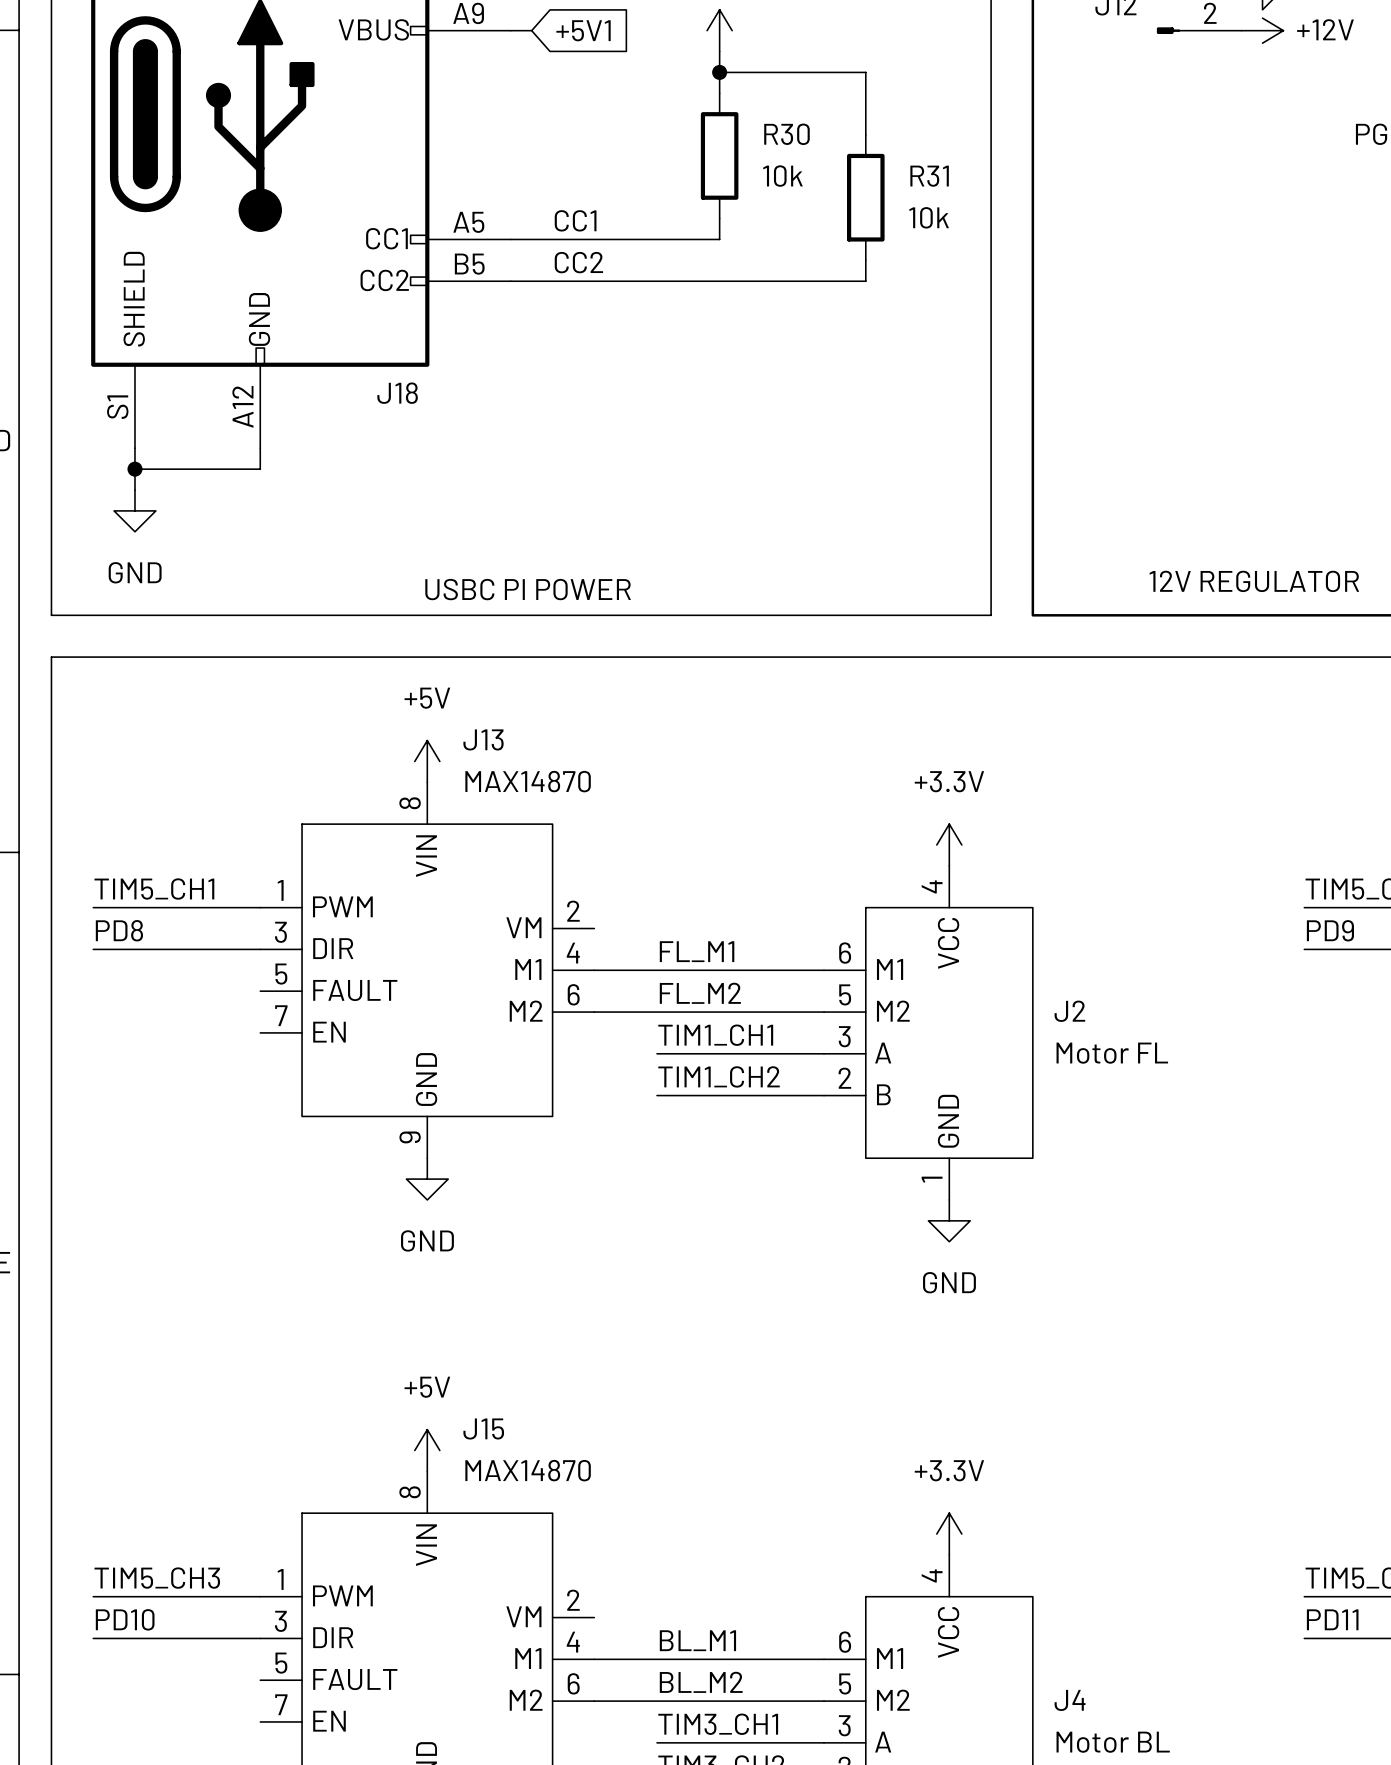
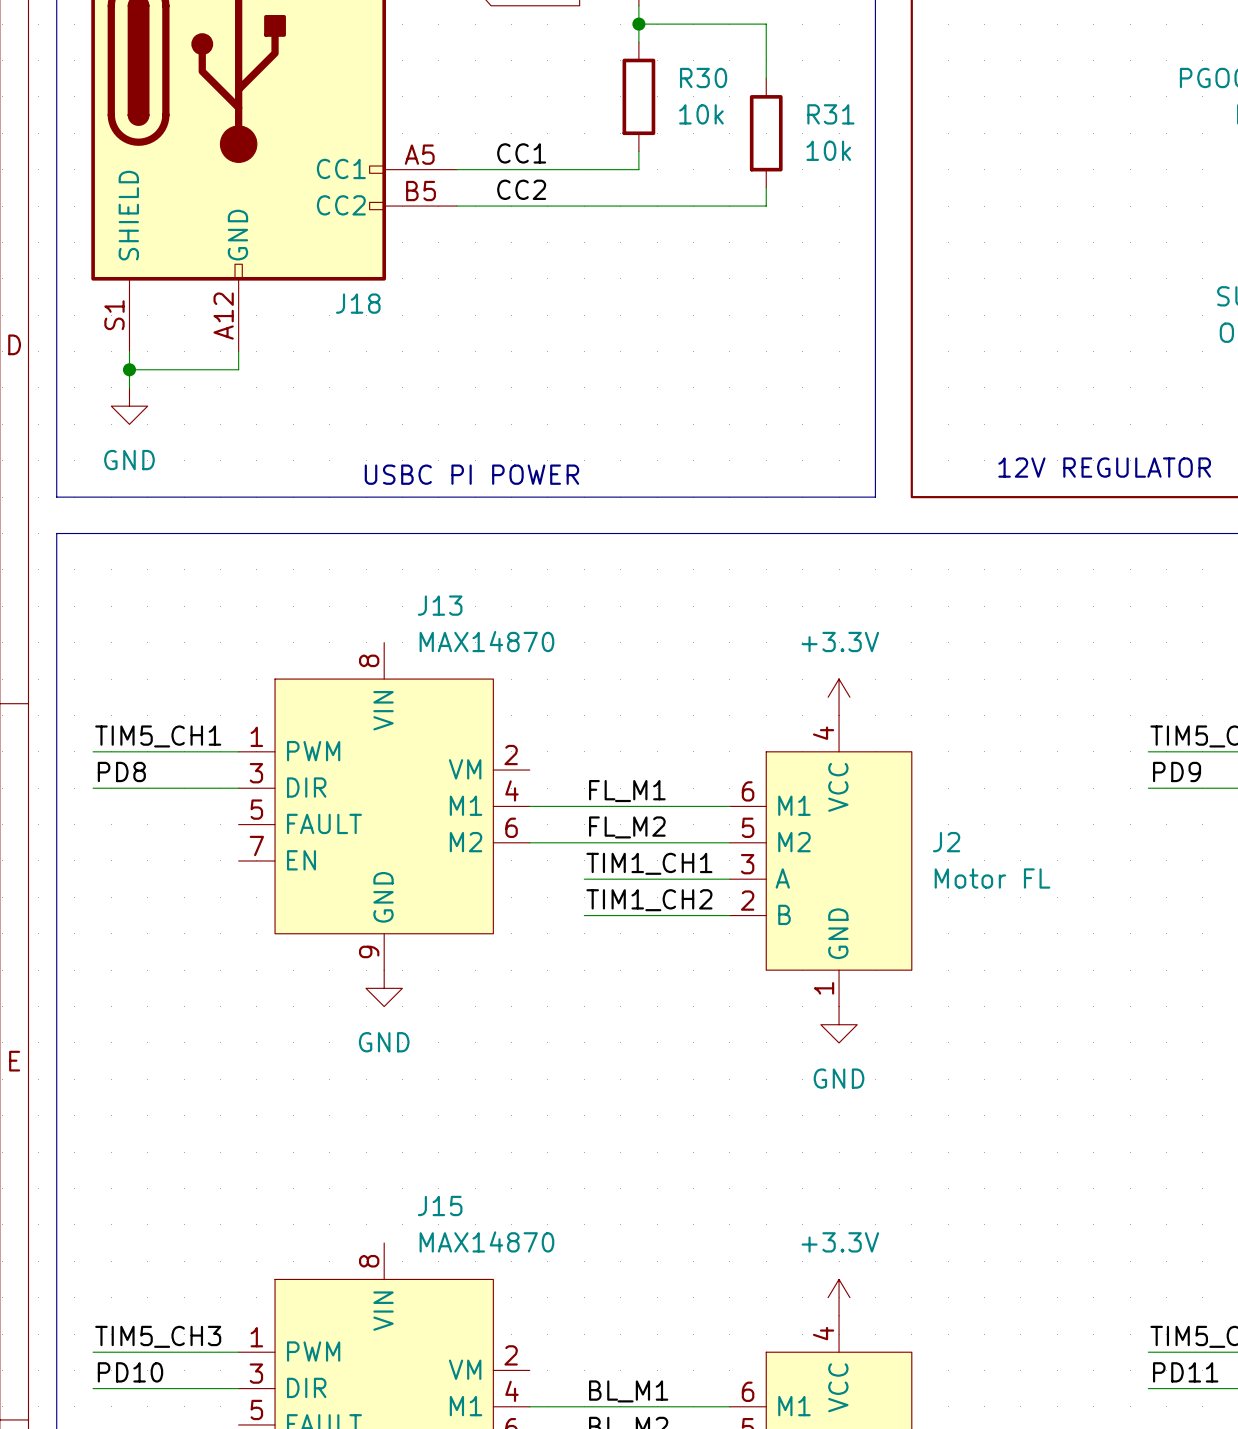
power symbol: +5V (427, 761) -> none
power symbol: +5V (427, 1450) -> none

